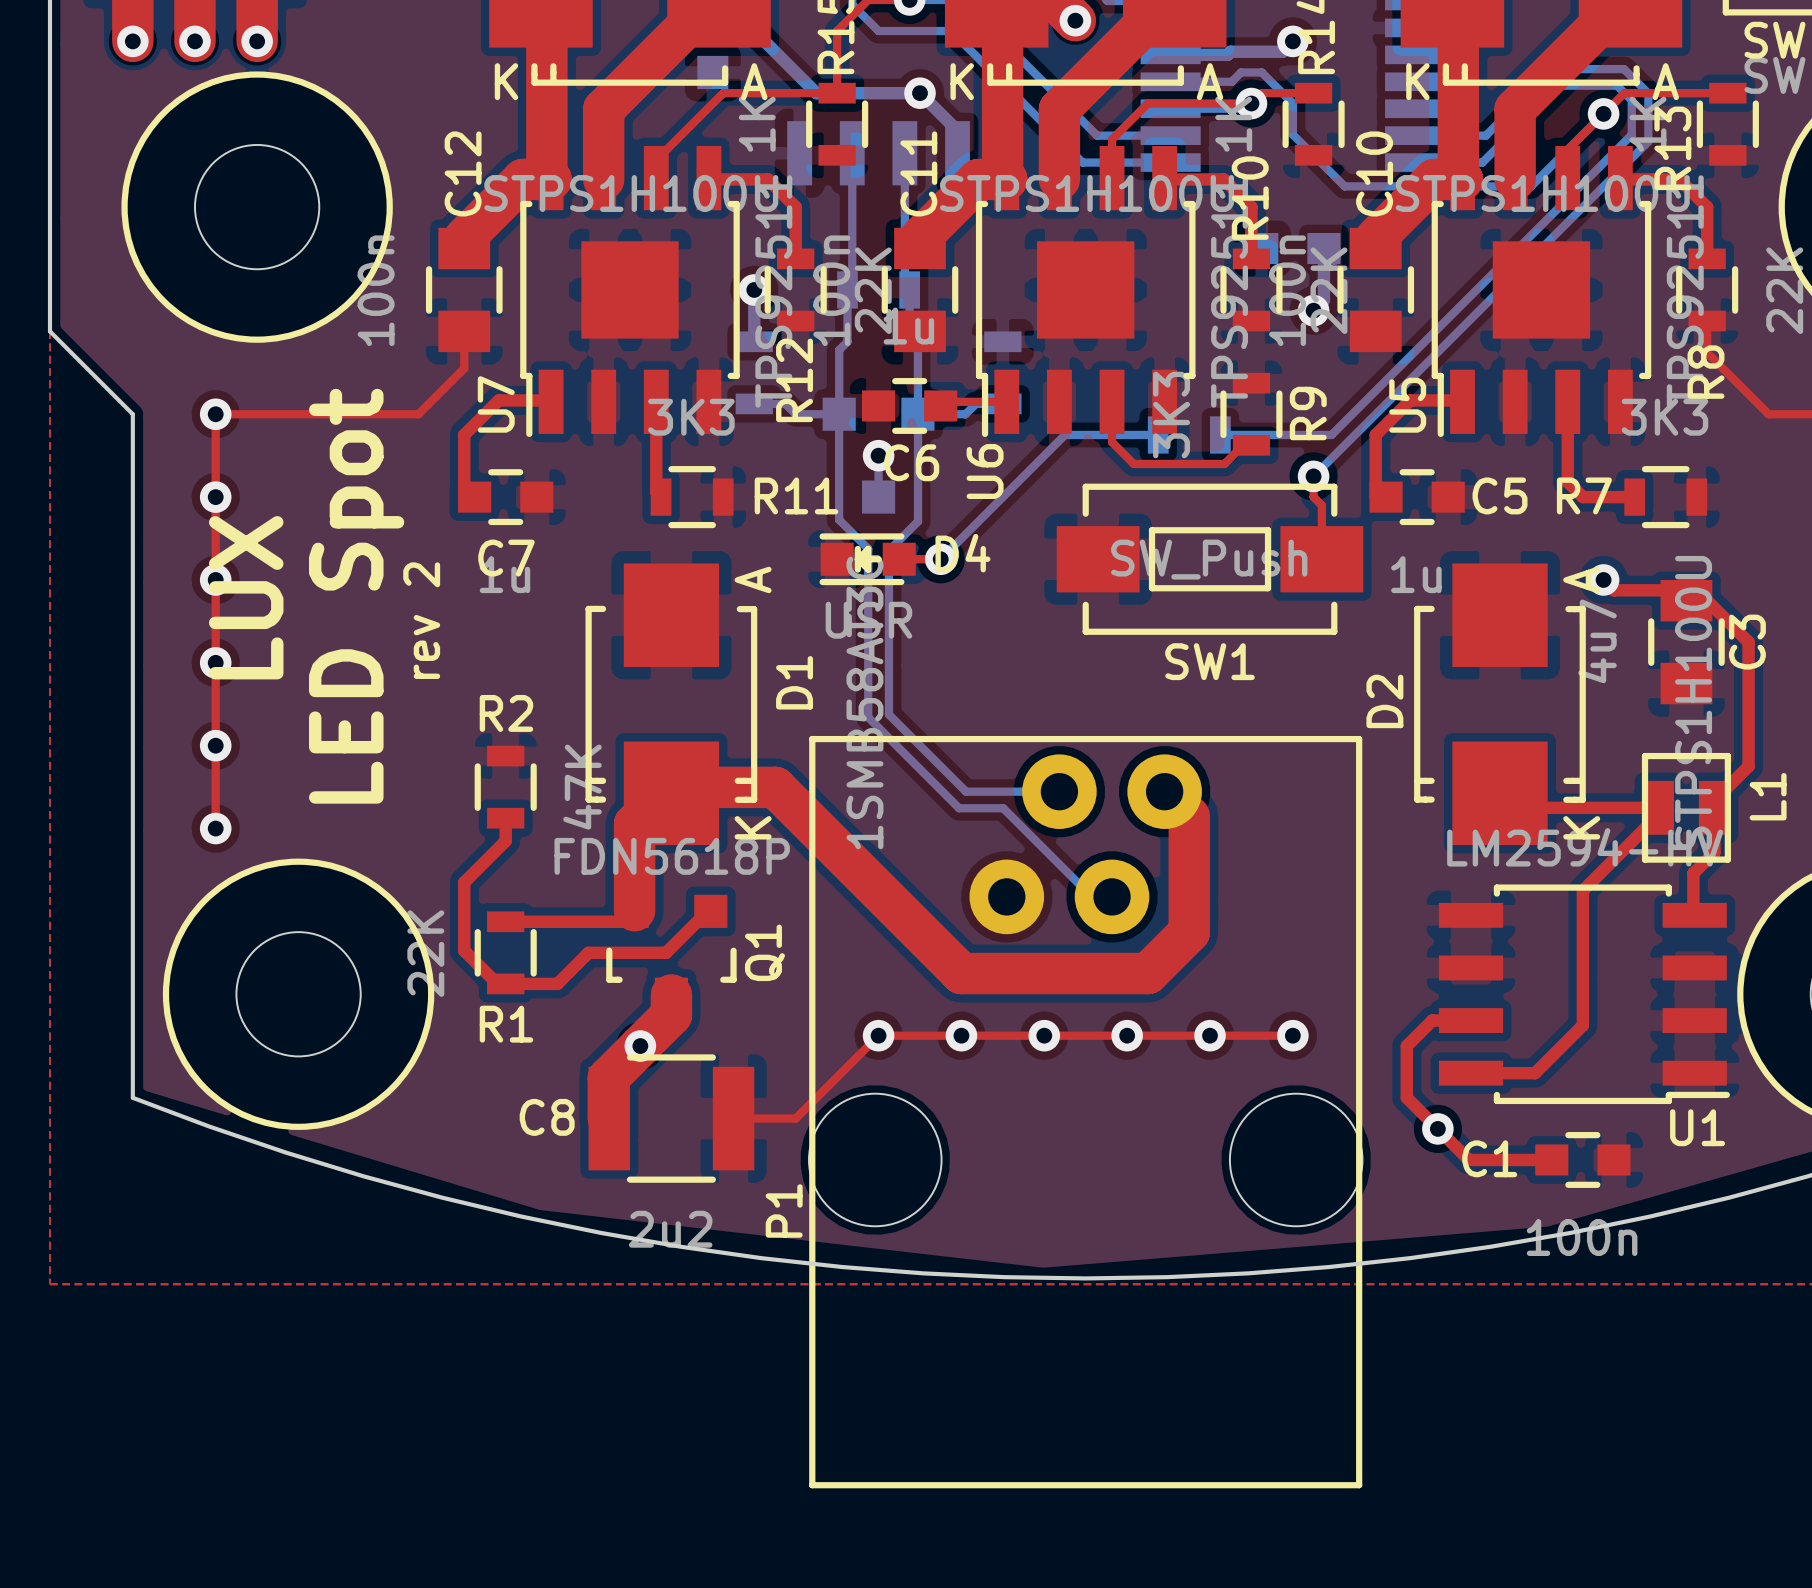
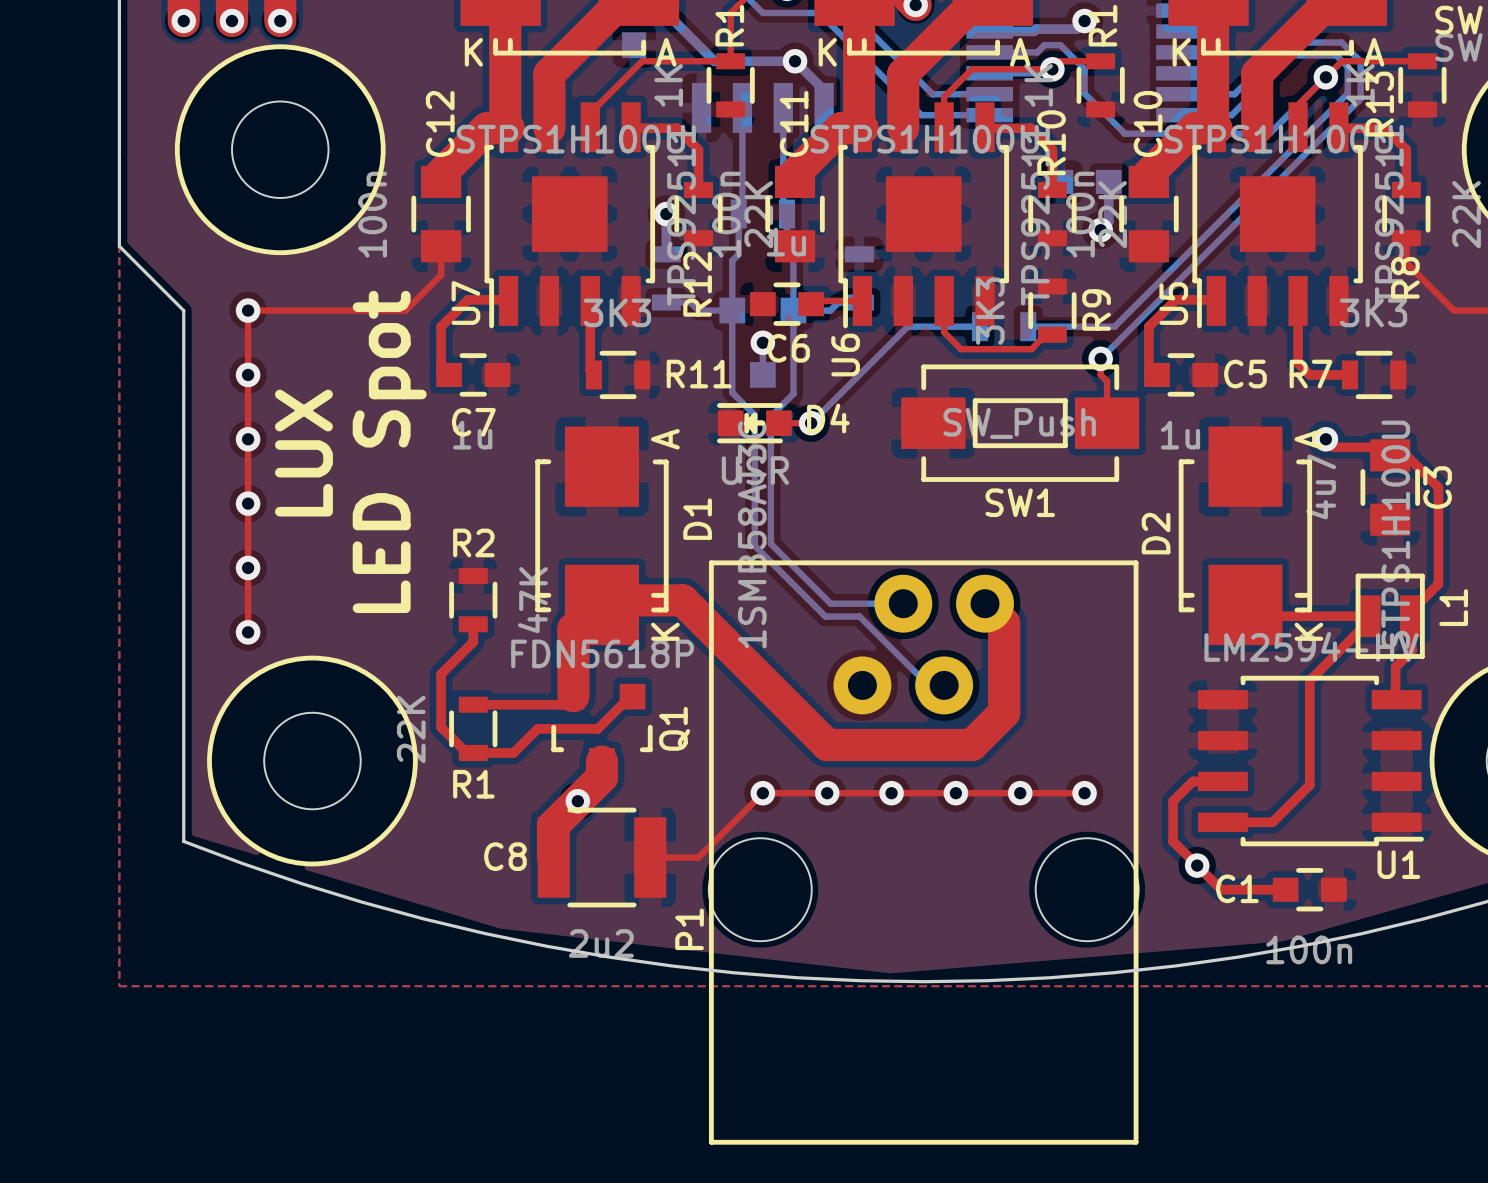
text position: LED Spot (356, 596) -> LED Spot (389, 451)
text position: LUX (246, 597) -> LUX (303, 453)
text: rev 2 (421, 620) -> none

